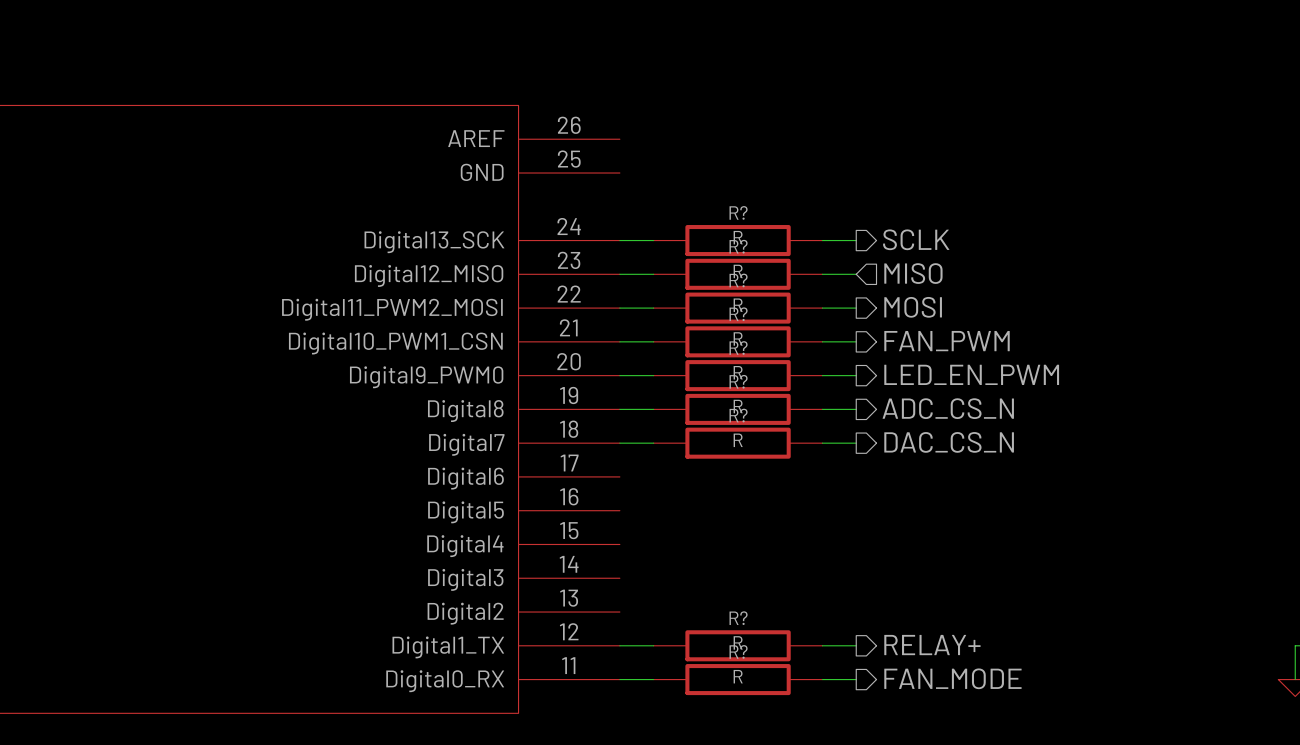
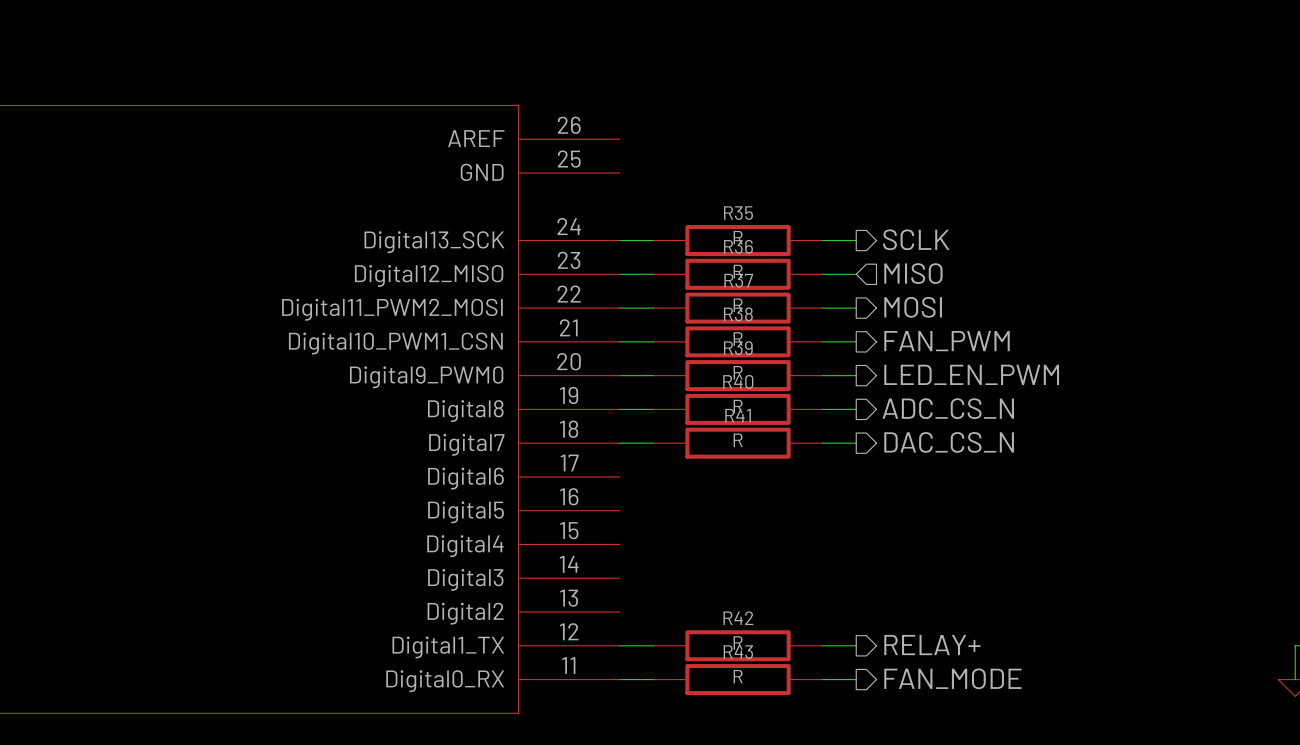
R? name: R? (738, 212) -> R35 (738, 213)
R? name: R? (738, 246) -> R36 (738, 246)
R? name: R? (738, 280) -> R37 (738, 280)
R? name: R? (738, 314) -> R38 (738, 314)
R? name: R? (738, 348) -> R39 (738, 348)
R? name: R? (738, 381) -> R40 (738, 381)
R? name: R? (738, 415) -> R41 (738, 415)
R? name: R? (738, 618) -> R42 (738, 618)
R? name: R? (738, 651) -> R43 (738, 652)

